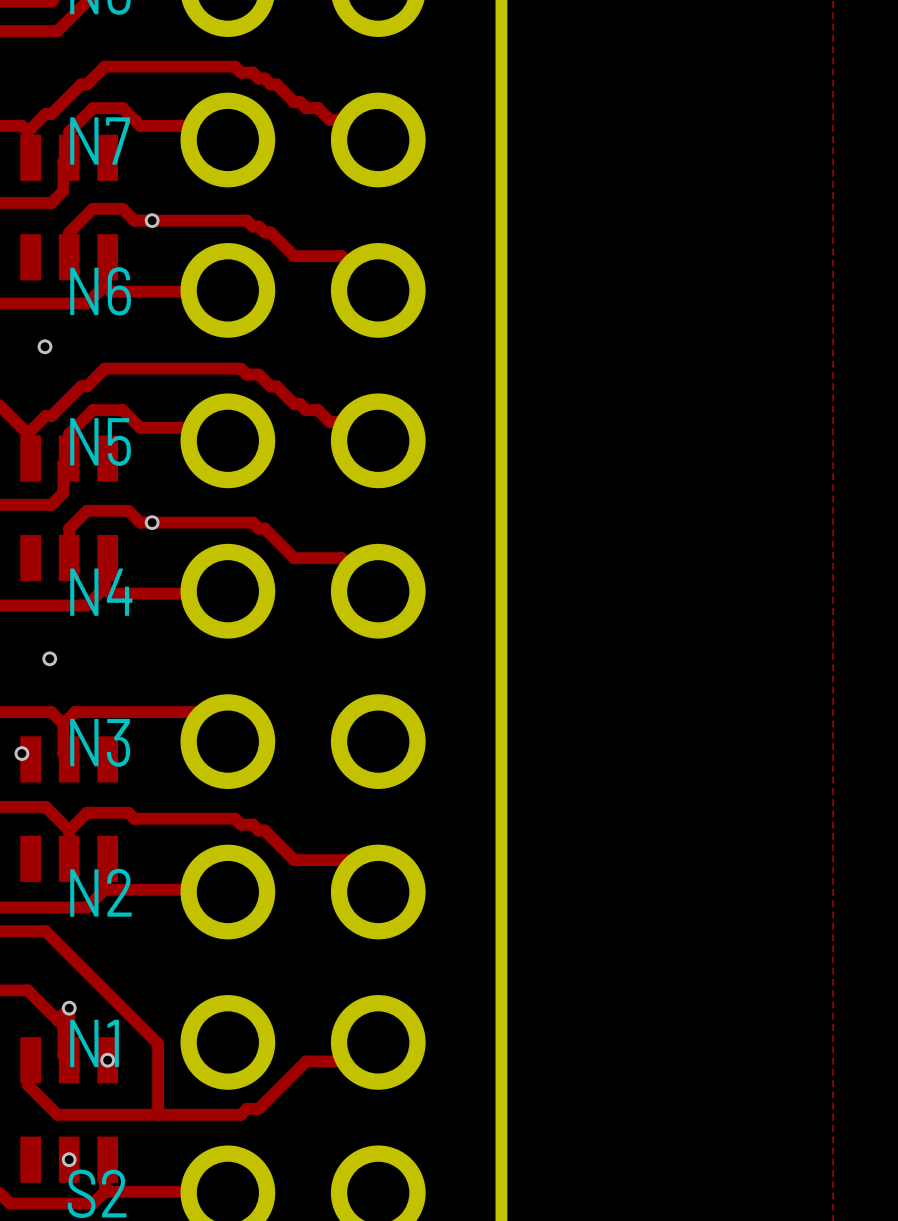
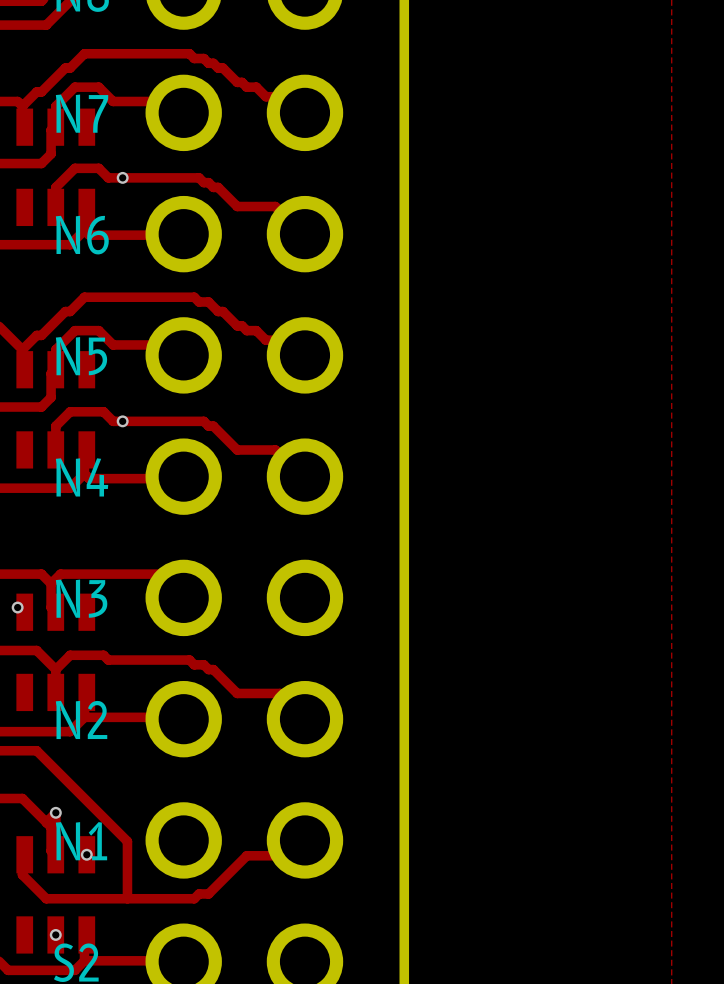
via: (44, 346) -> none
via: (49, 658) -> none

